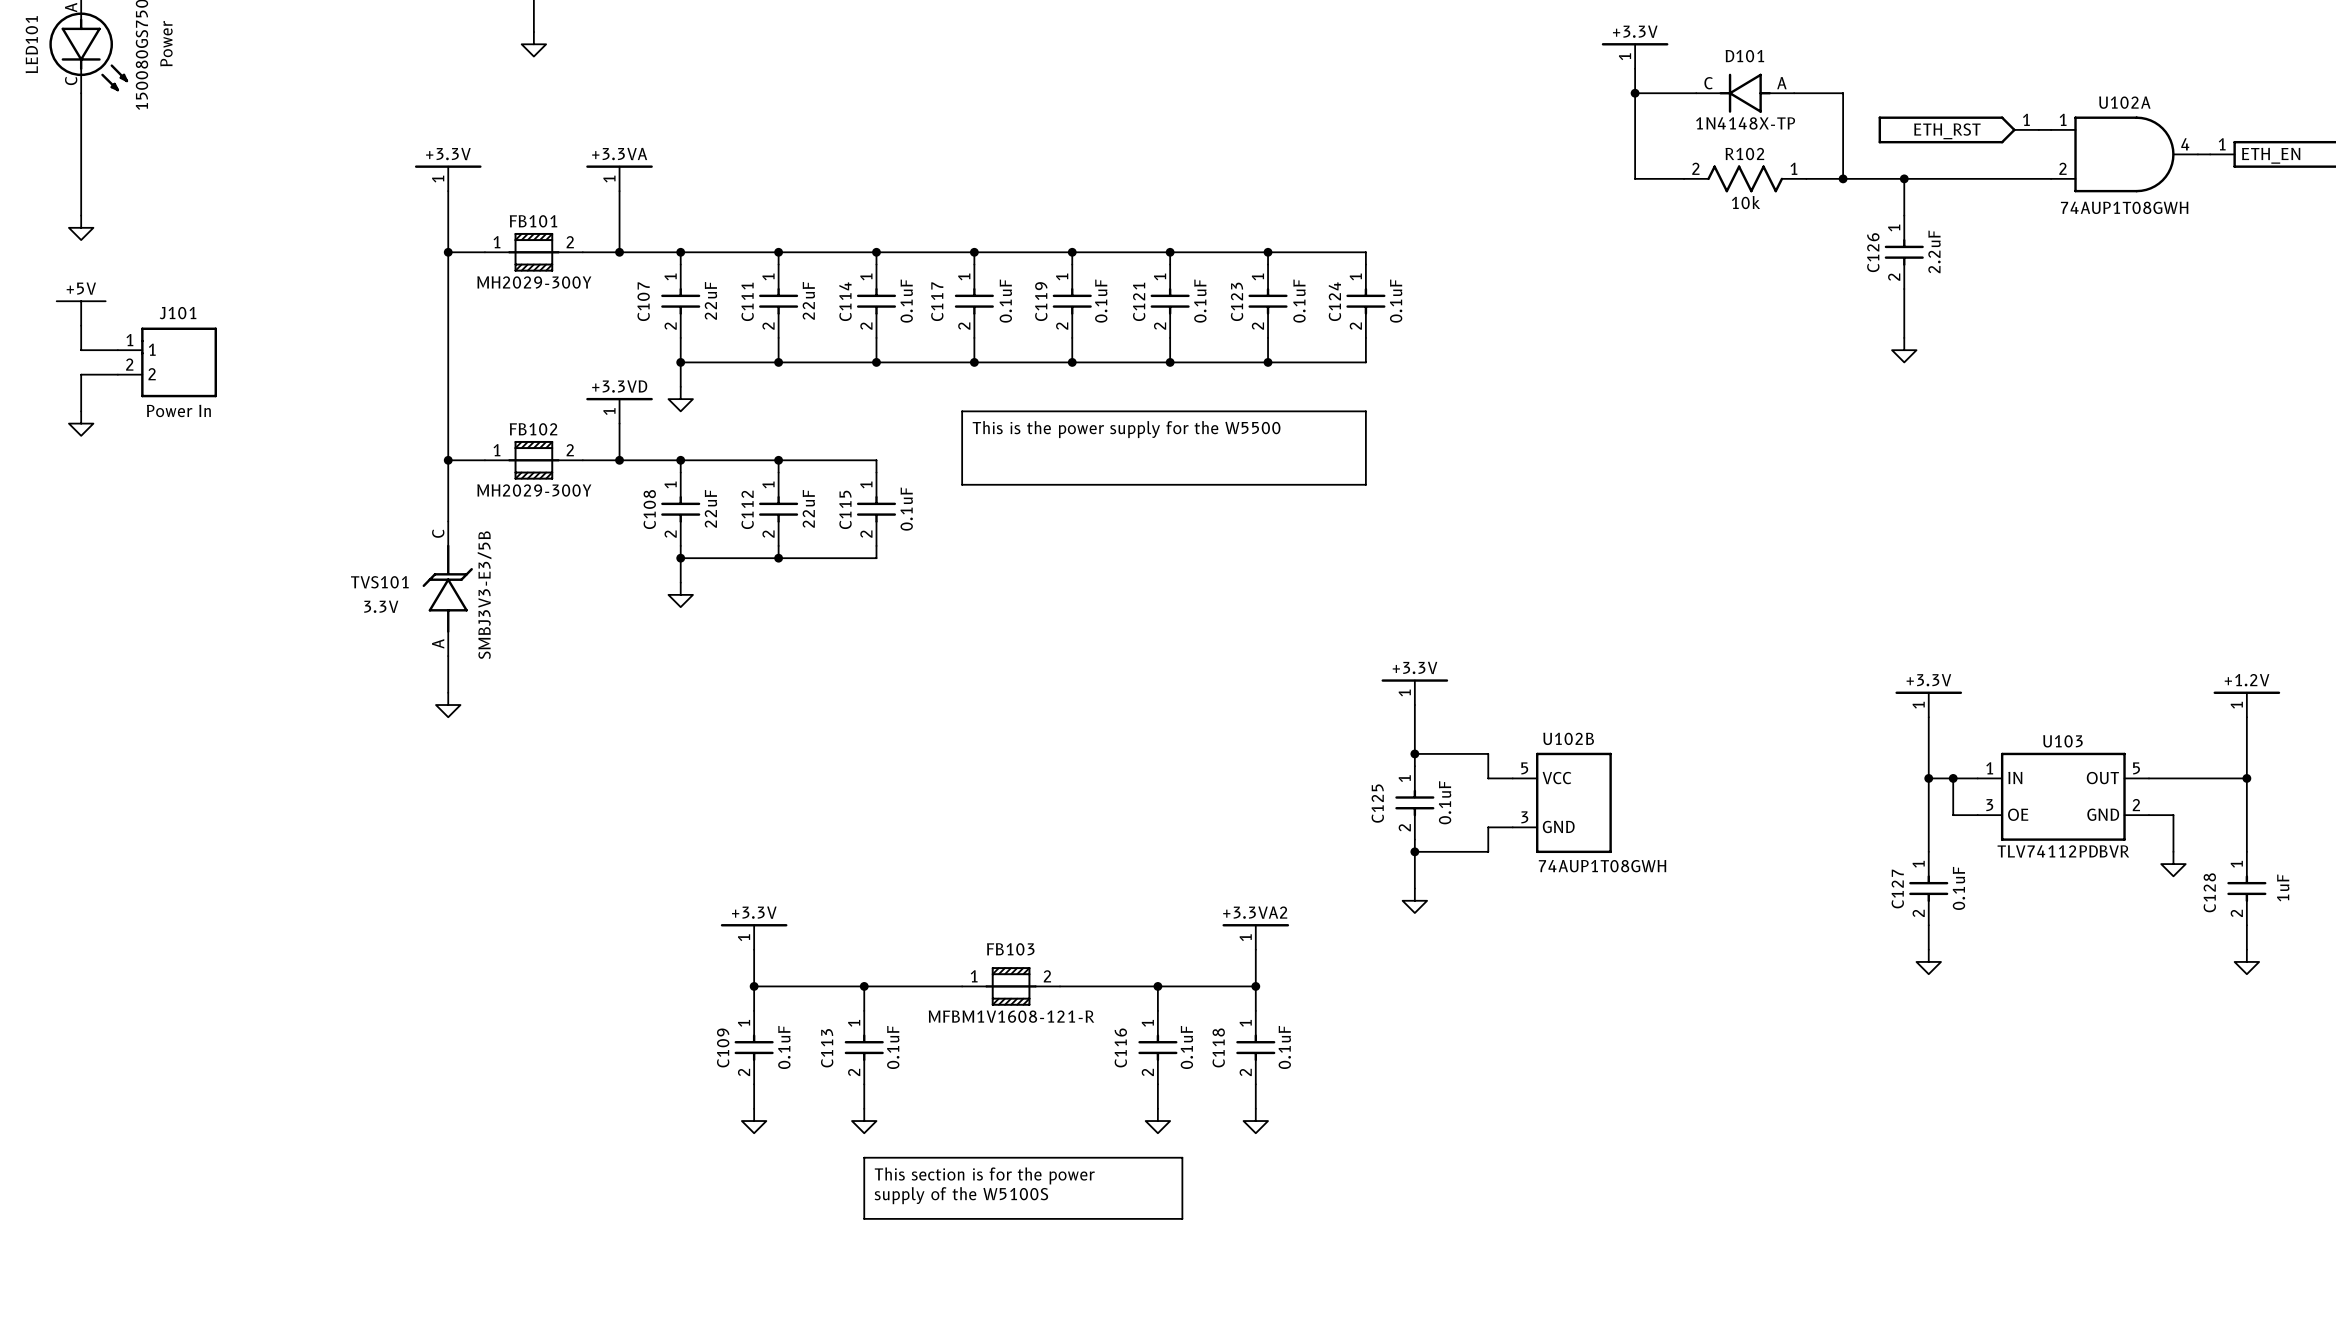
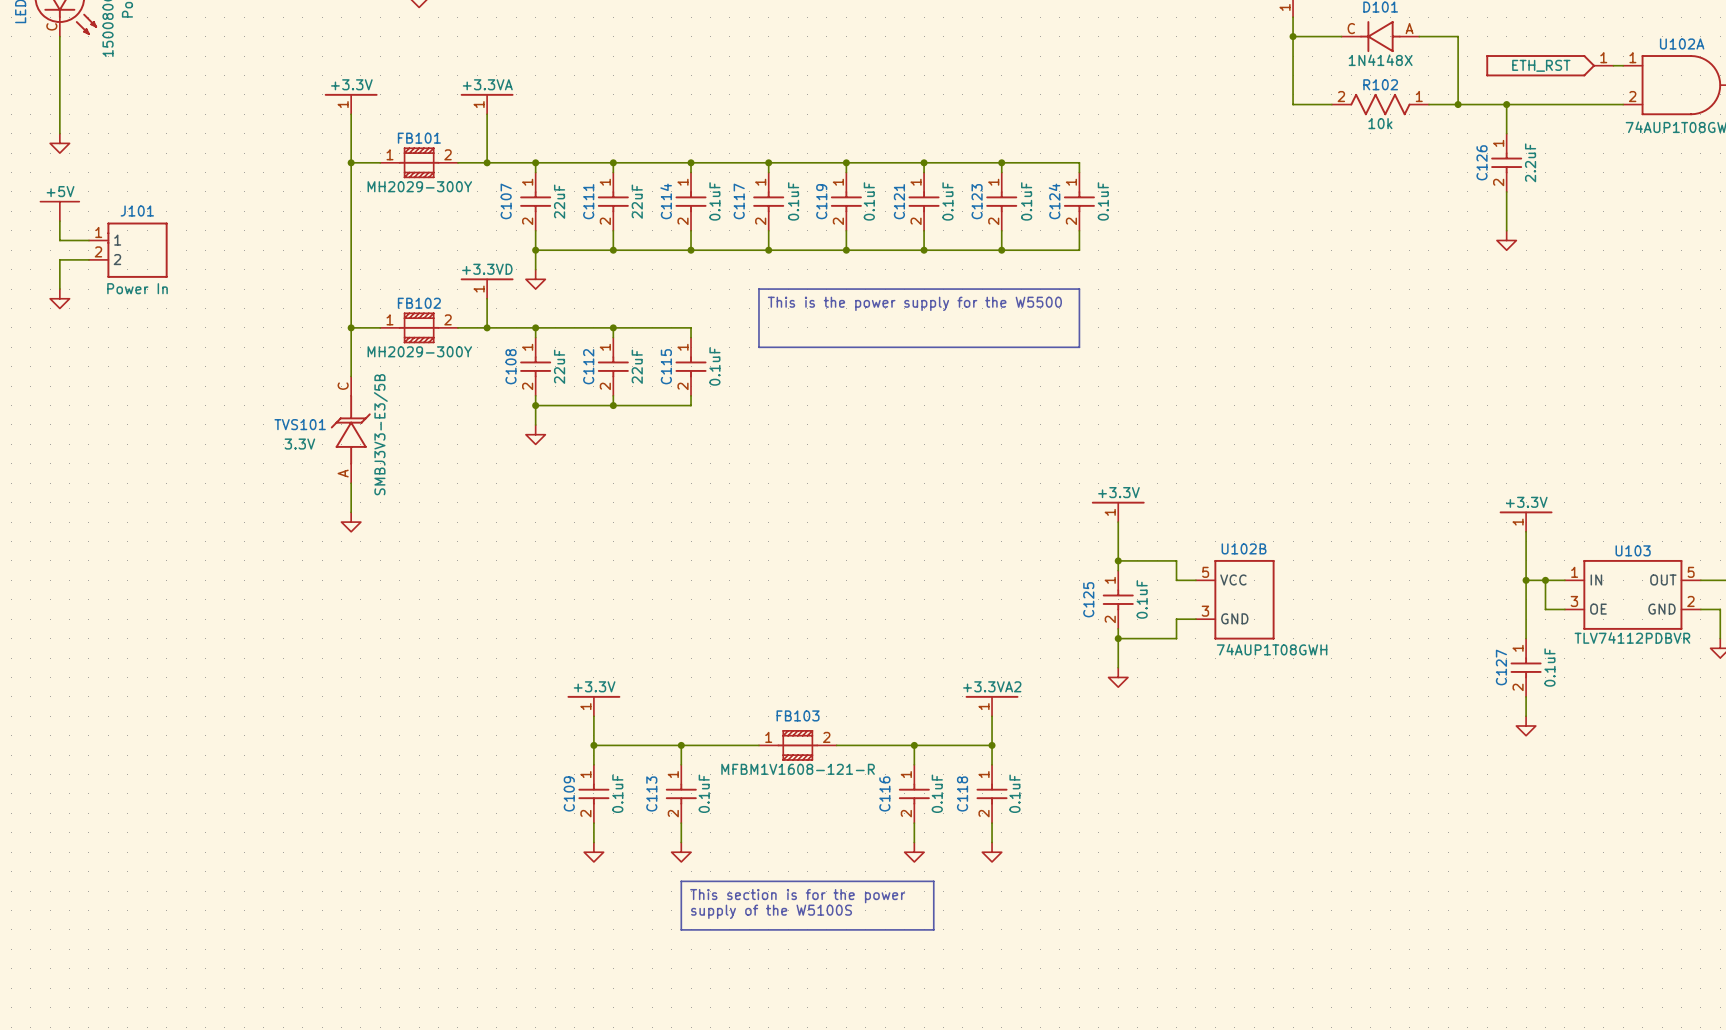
D101 text: 1N4148X-TP (1745, 123) -> 1N4148X (1380, 60)

